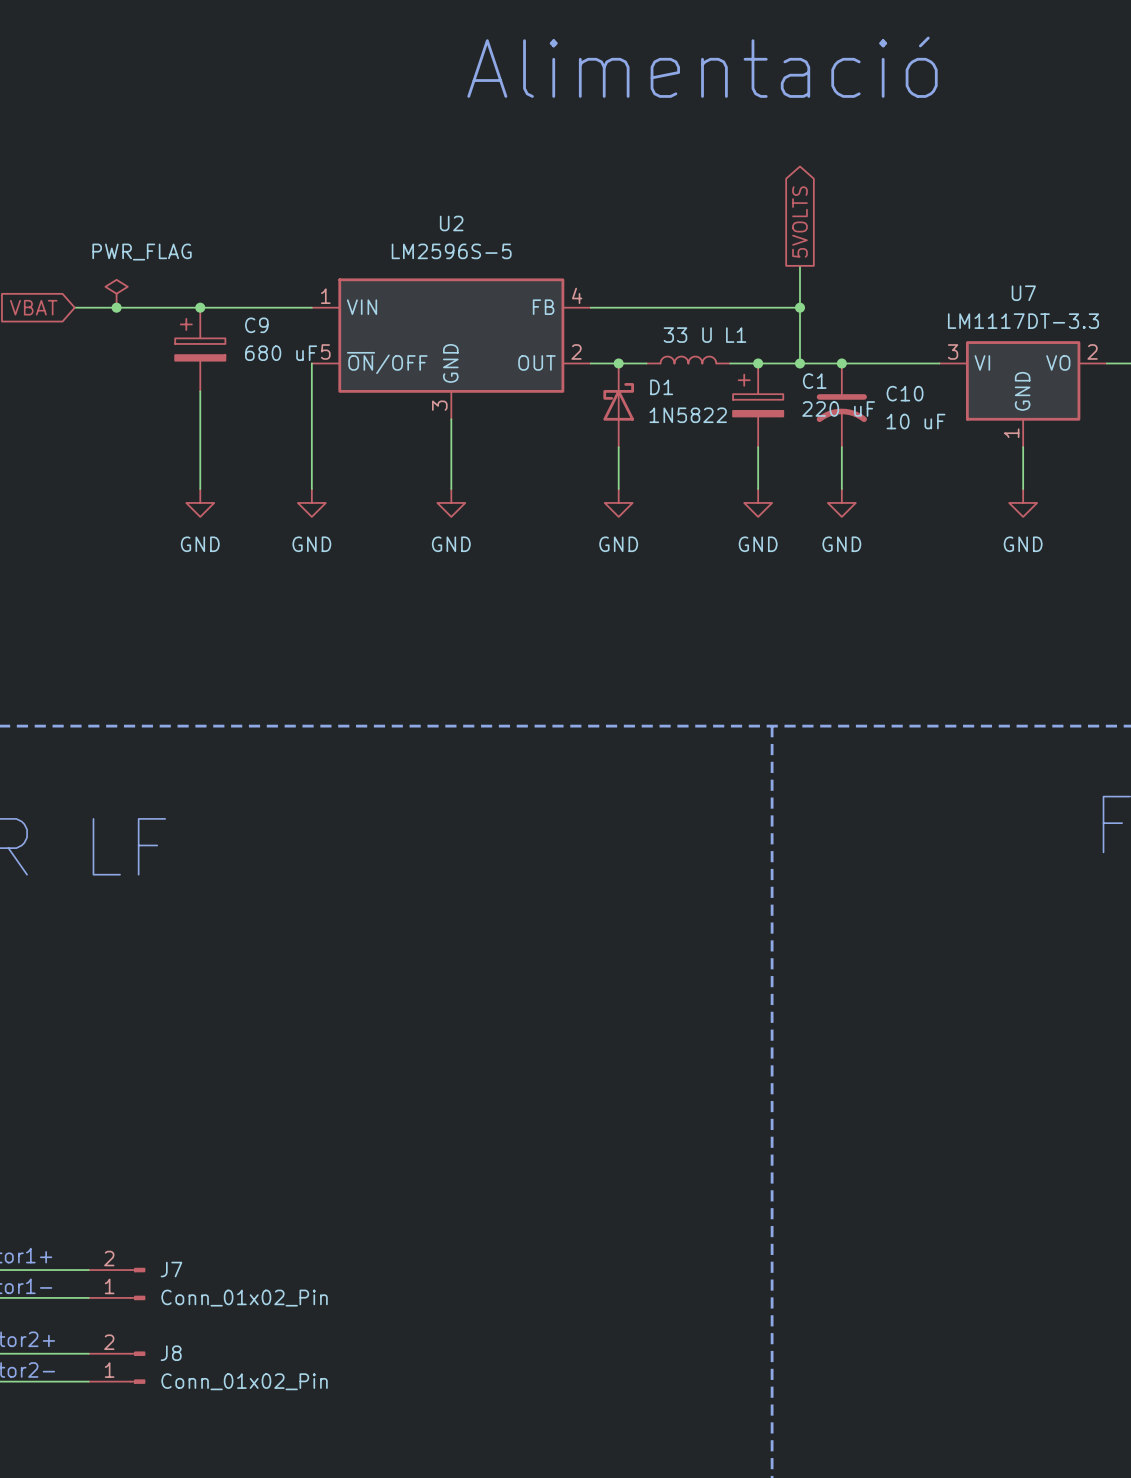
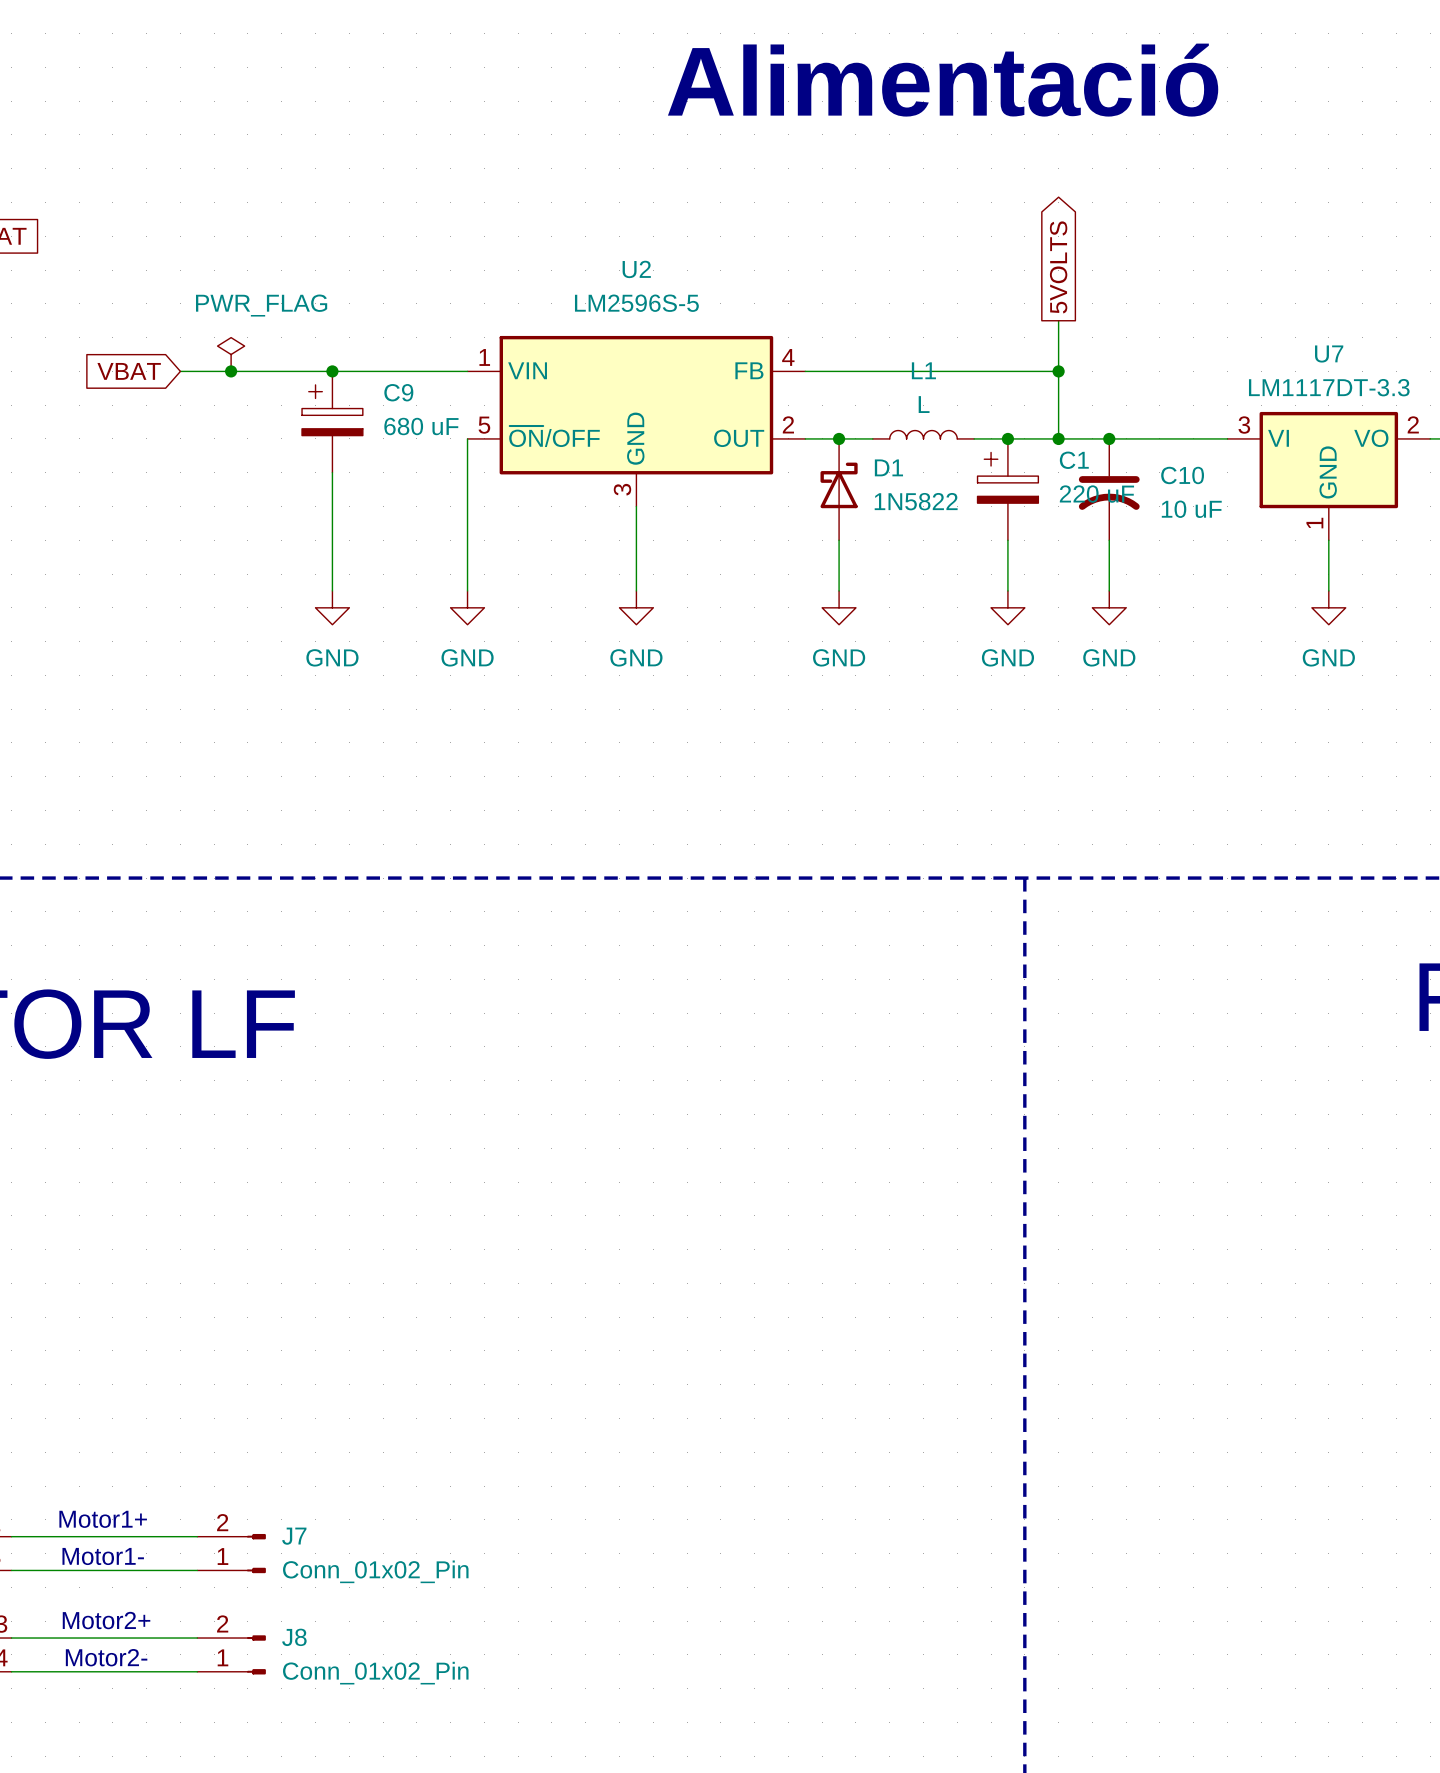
L1 value: 33 U (687, 335) -> L (924, 404)
L1 name position: L1 (736, 335) -> L1 (923, 370)

